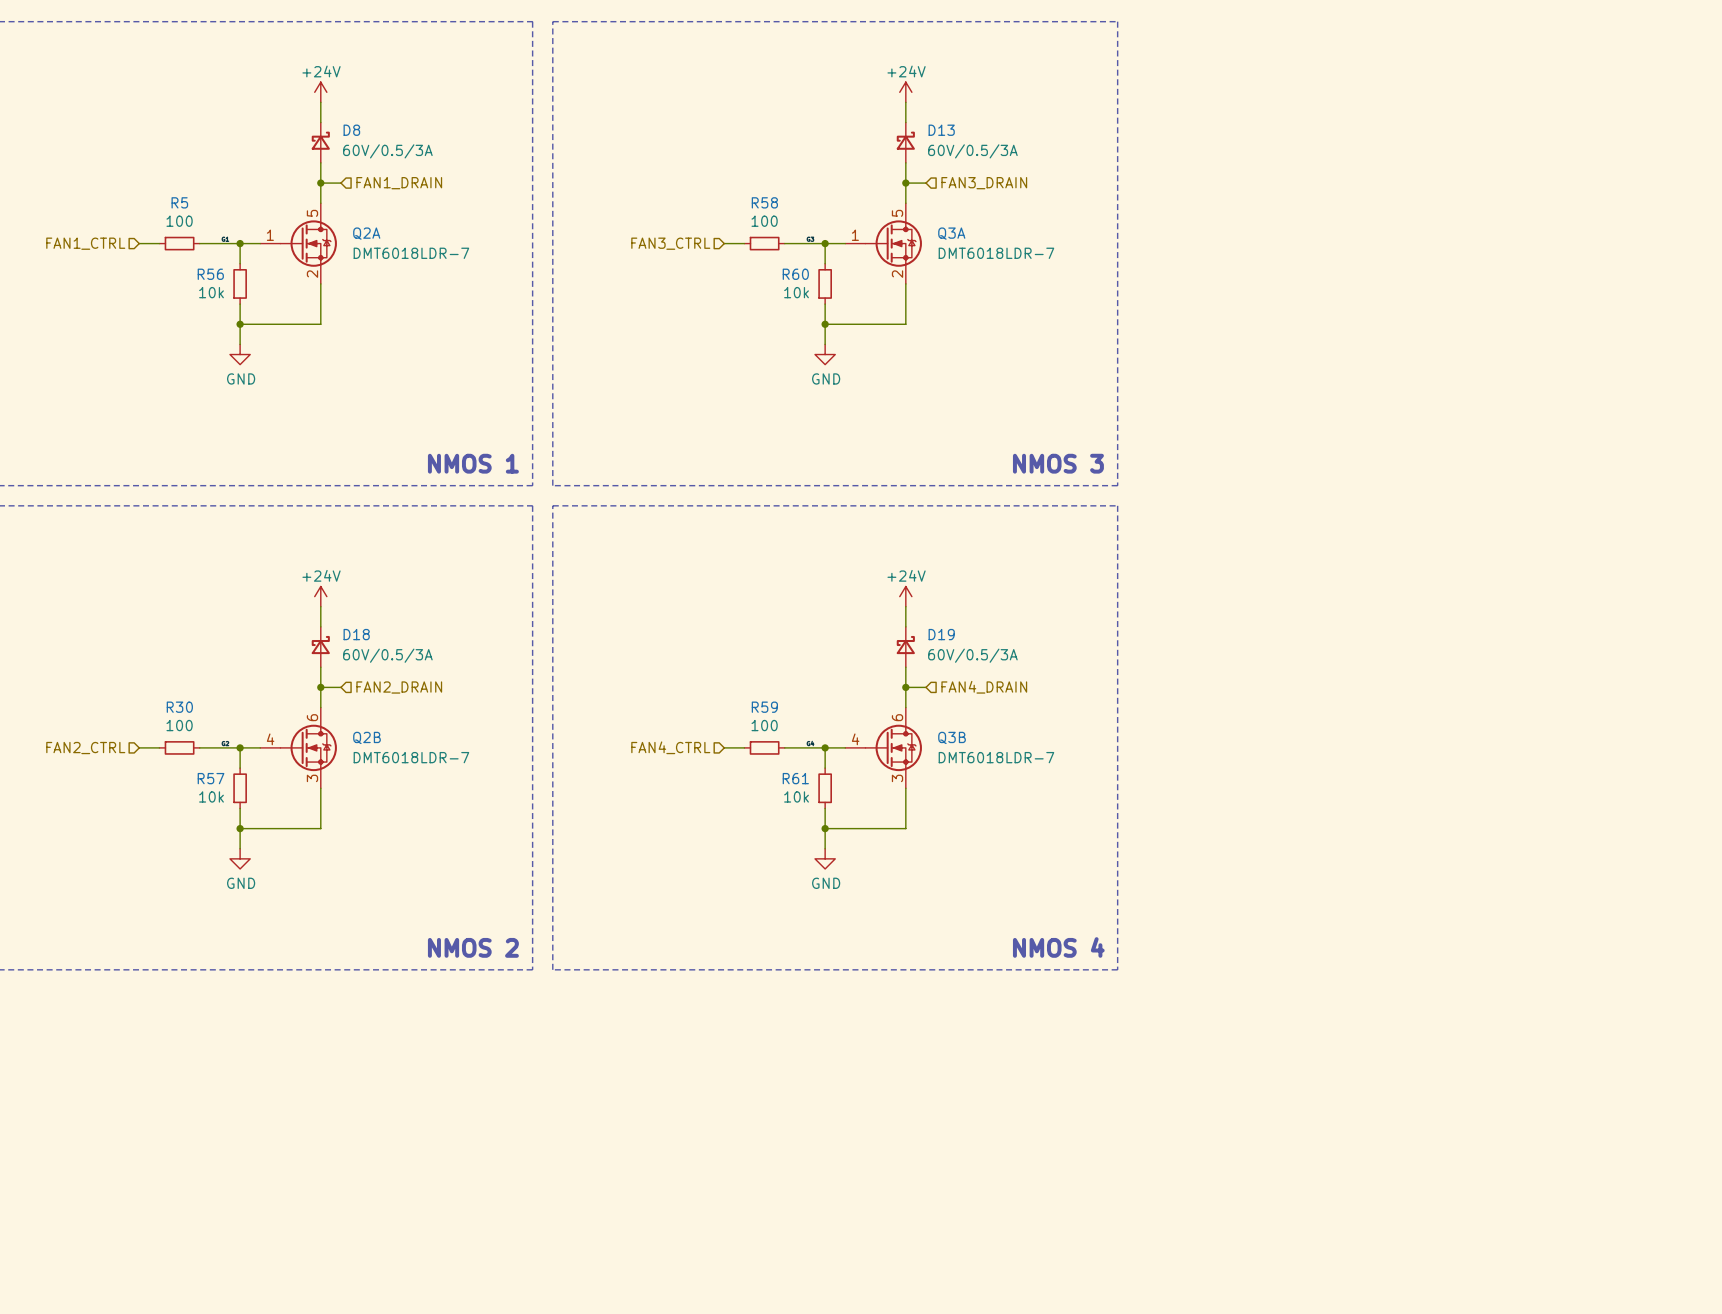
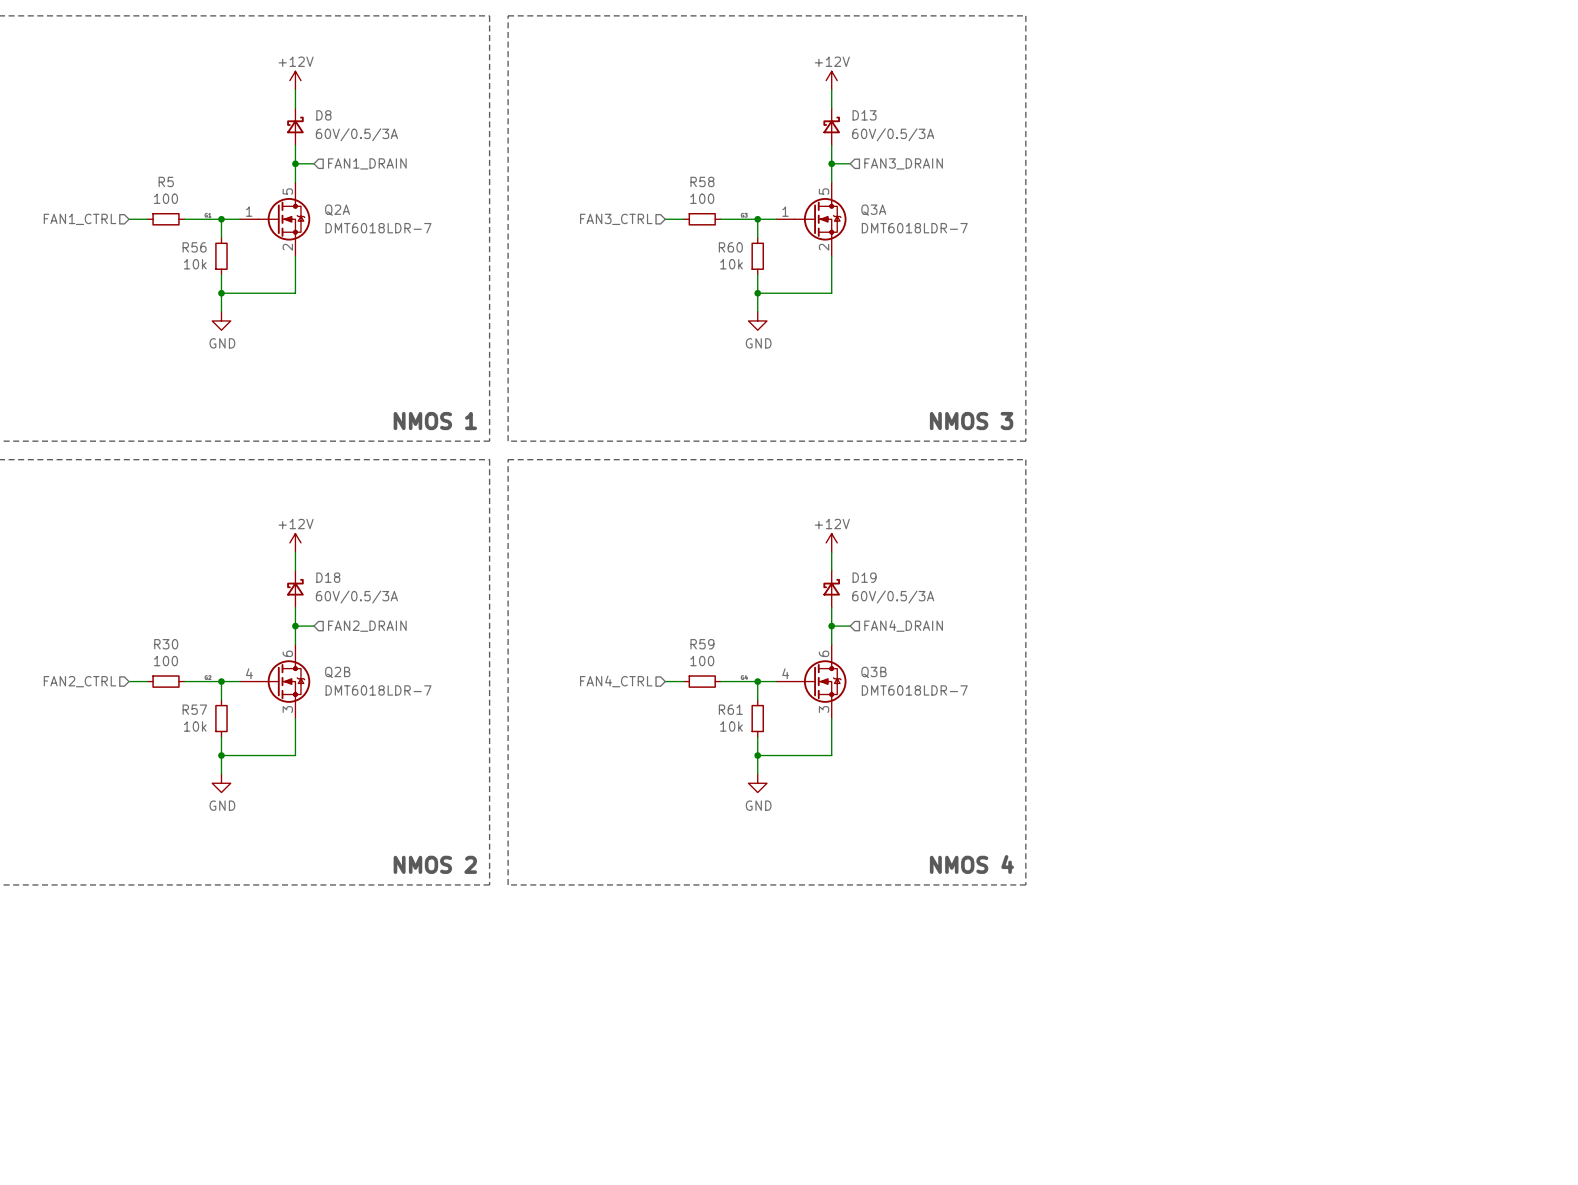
power symbol: +24V (320, 92) -> +12V (295, 80)
power symbol: +24V (905, 92) -> +12V (831, 80)
power symbol: +24V (320, 596) -> +12V (295, 542)
power symbol: +24V (905, 596) -> +12V (831, 542)

